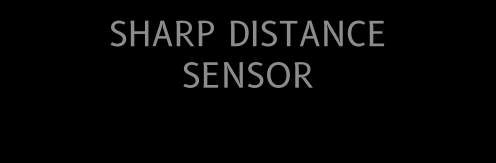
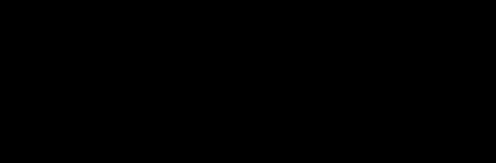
text: SHARP DISTANCE (247, 33) -> none
text: SENSOR (248, 74) -> none

